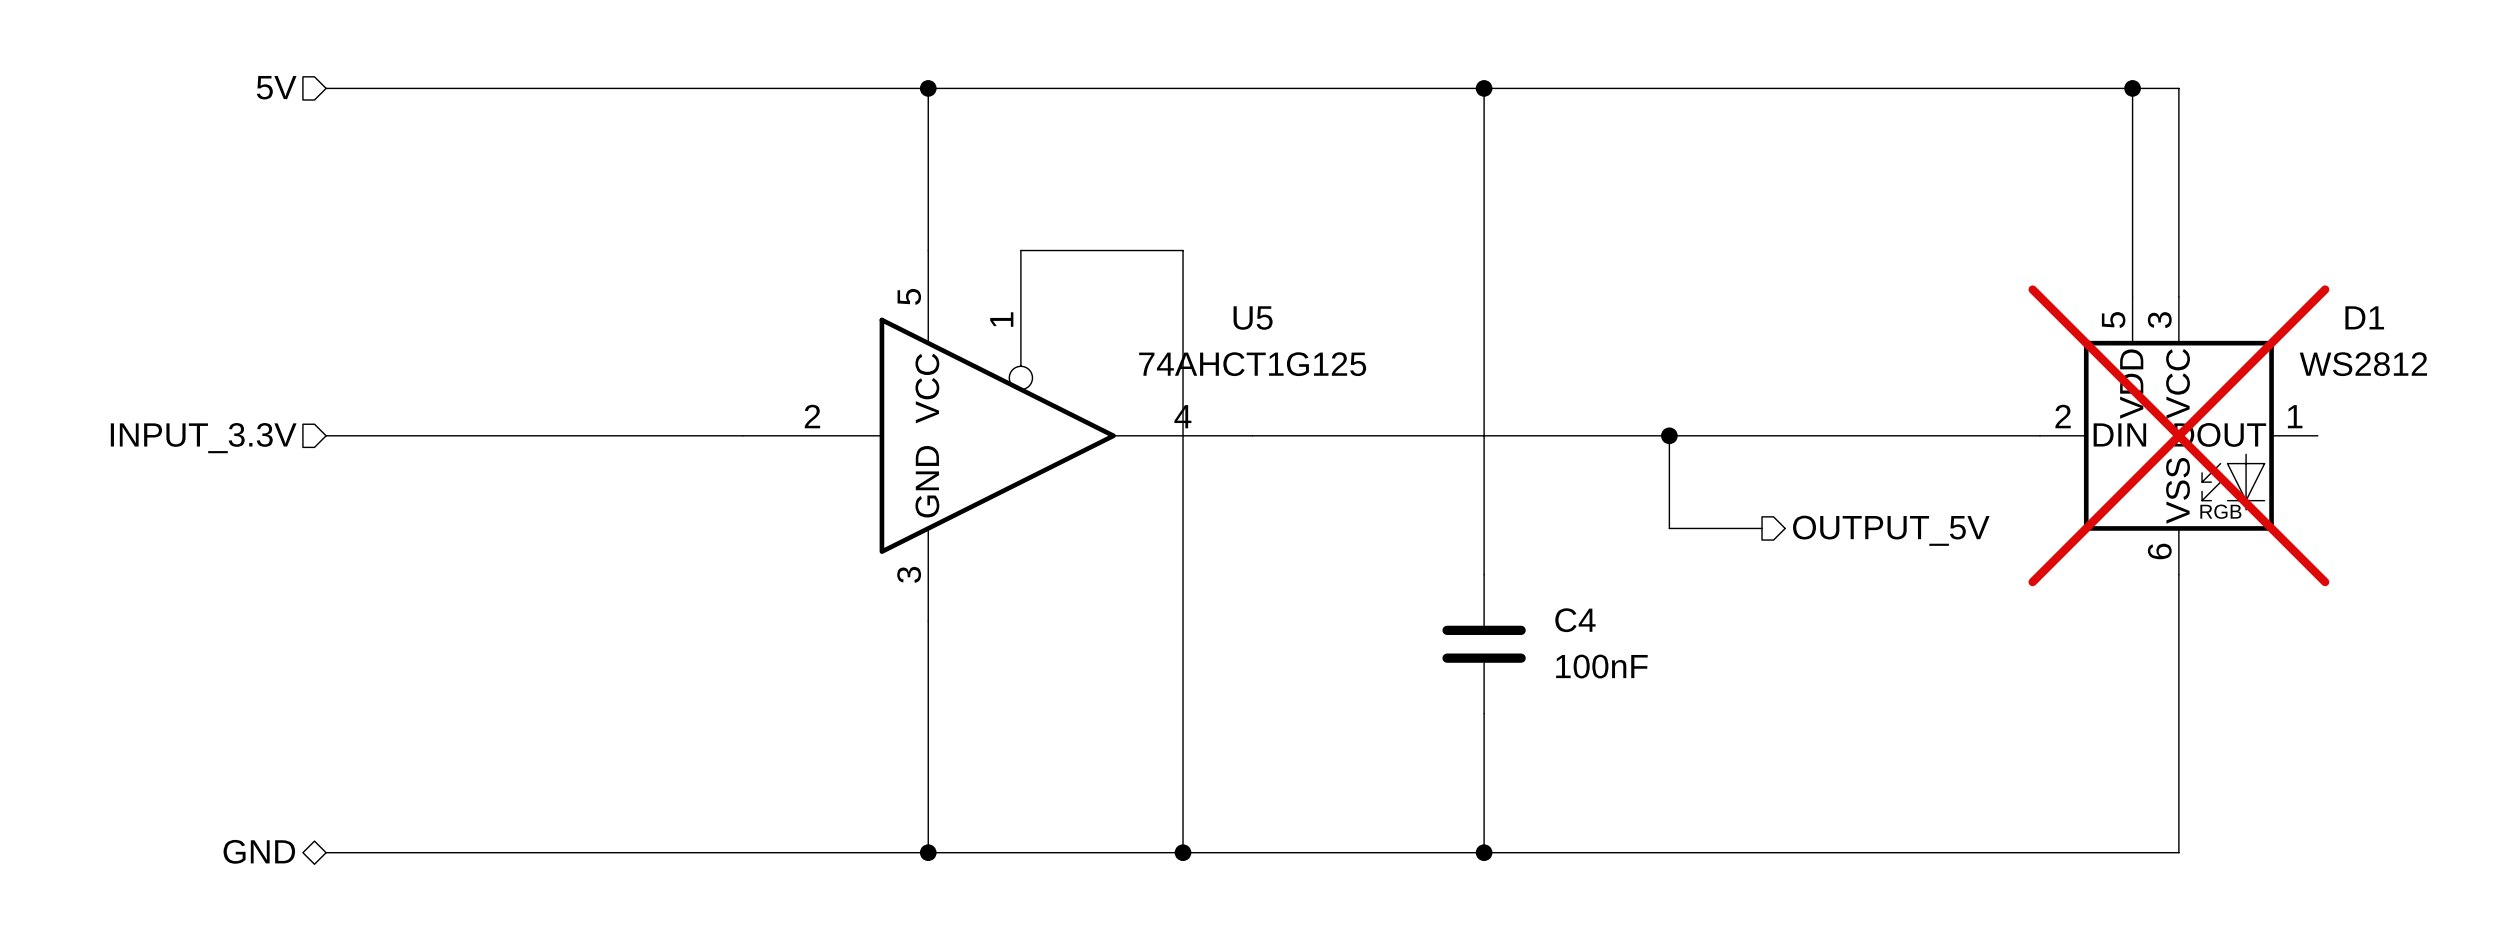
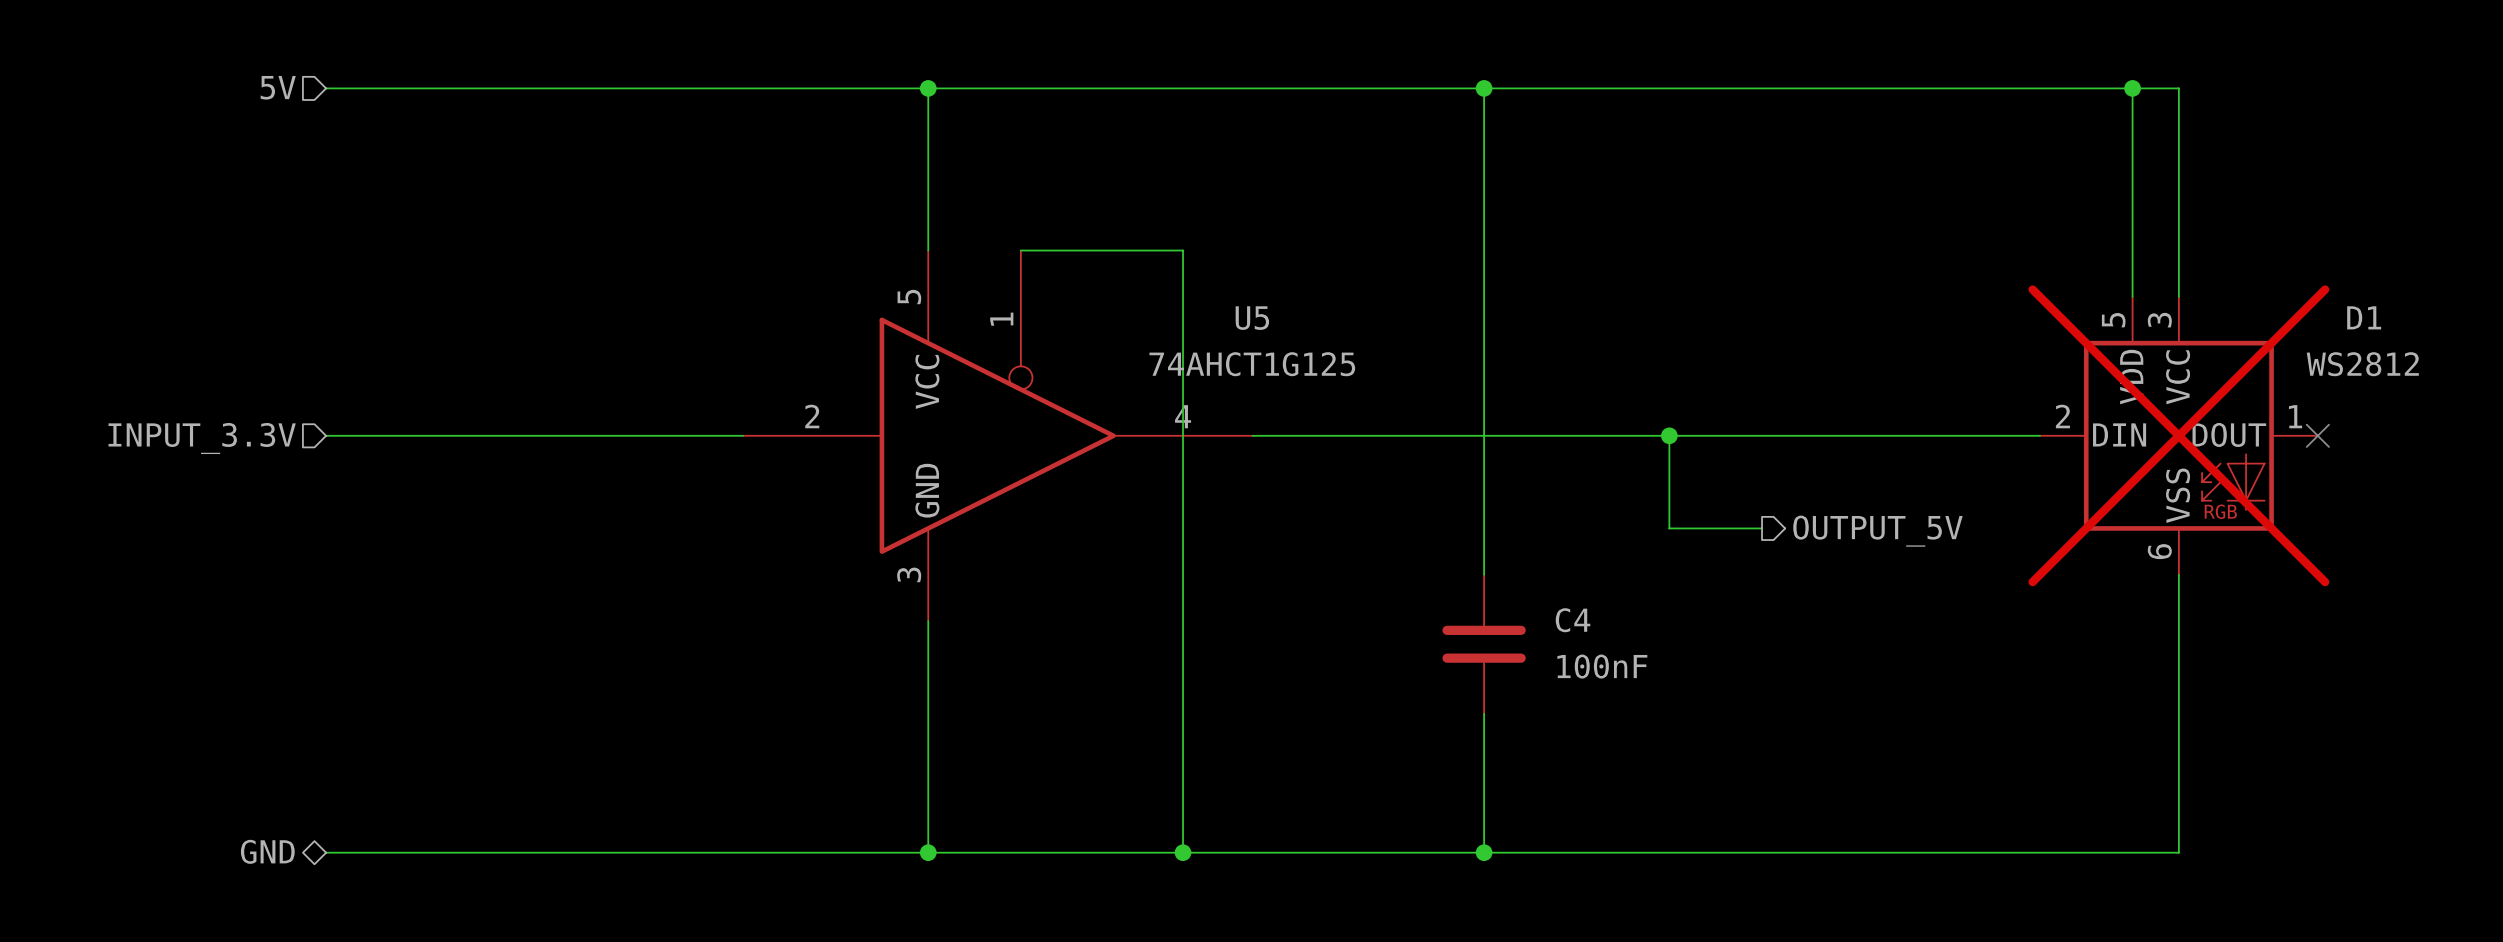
no-connect mark: none -> (2317, 435)

